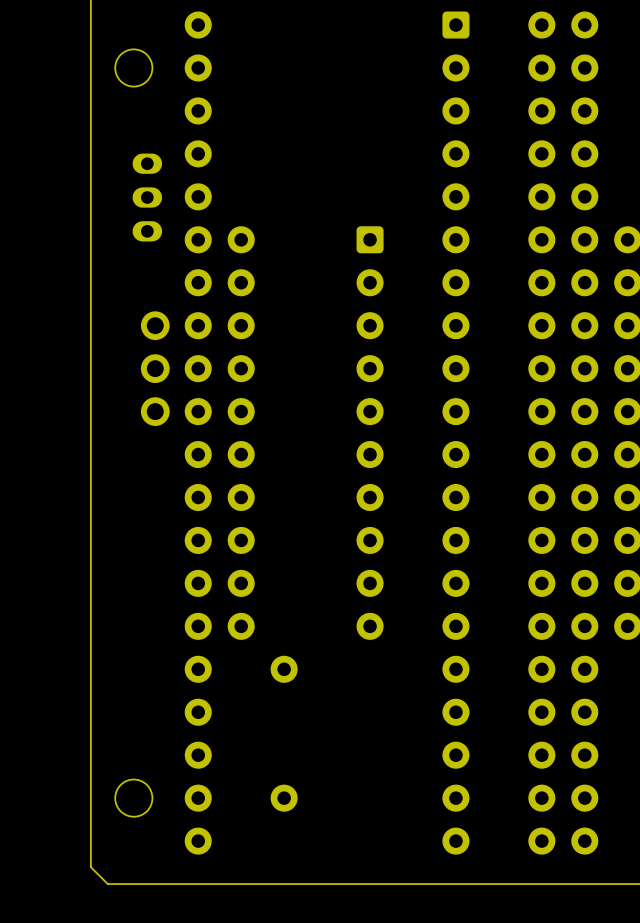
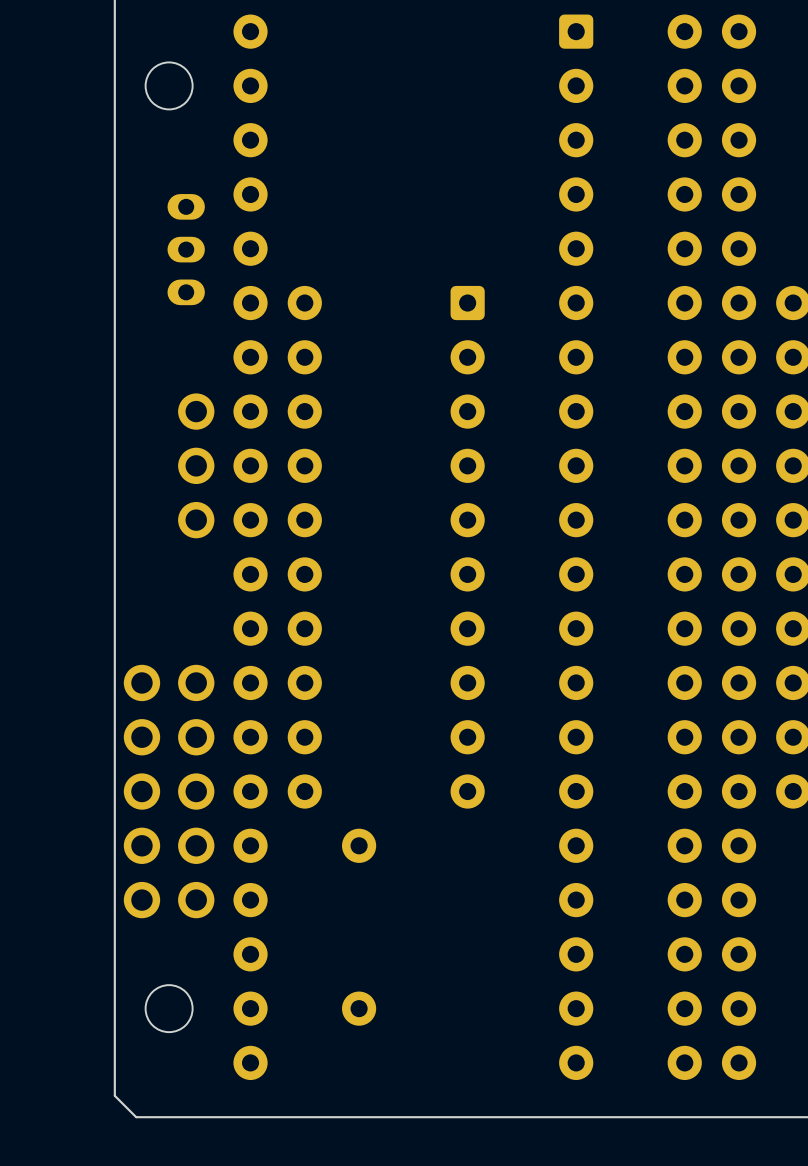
part: none -> (169, 791)

